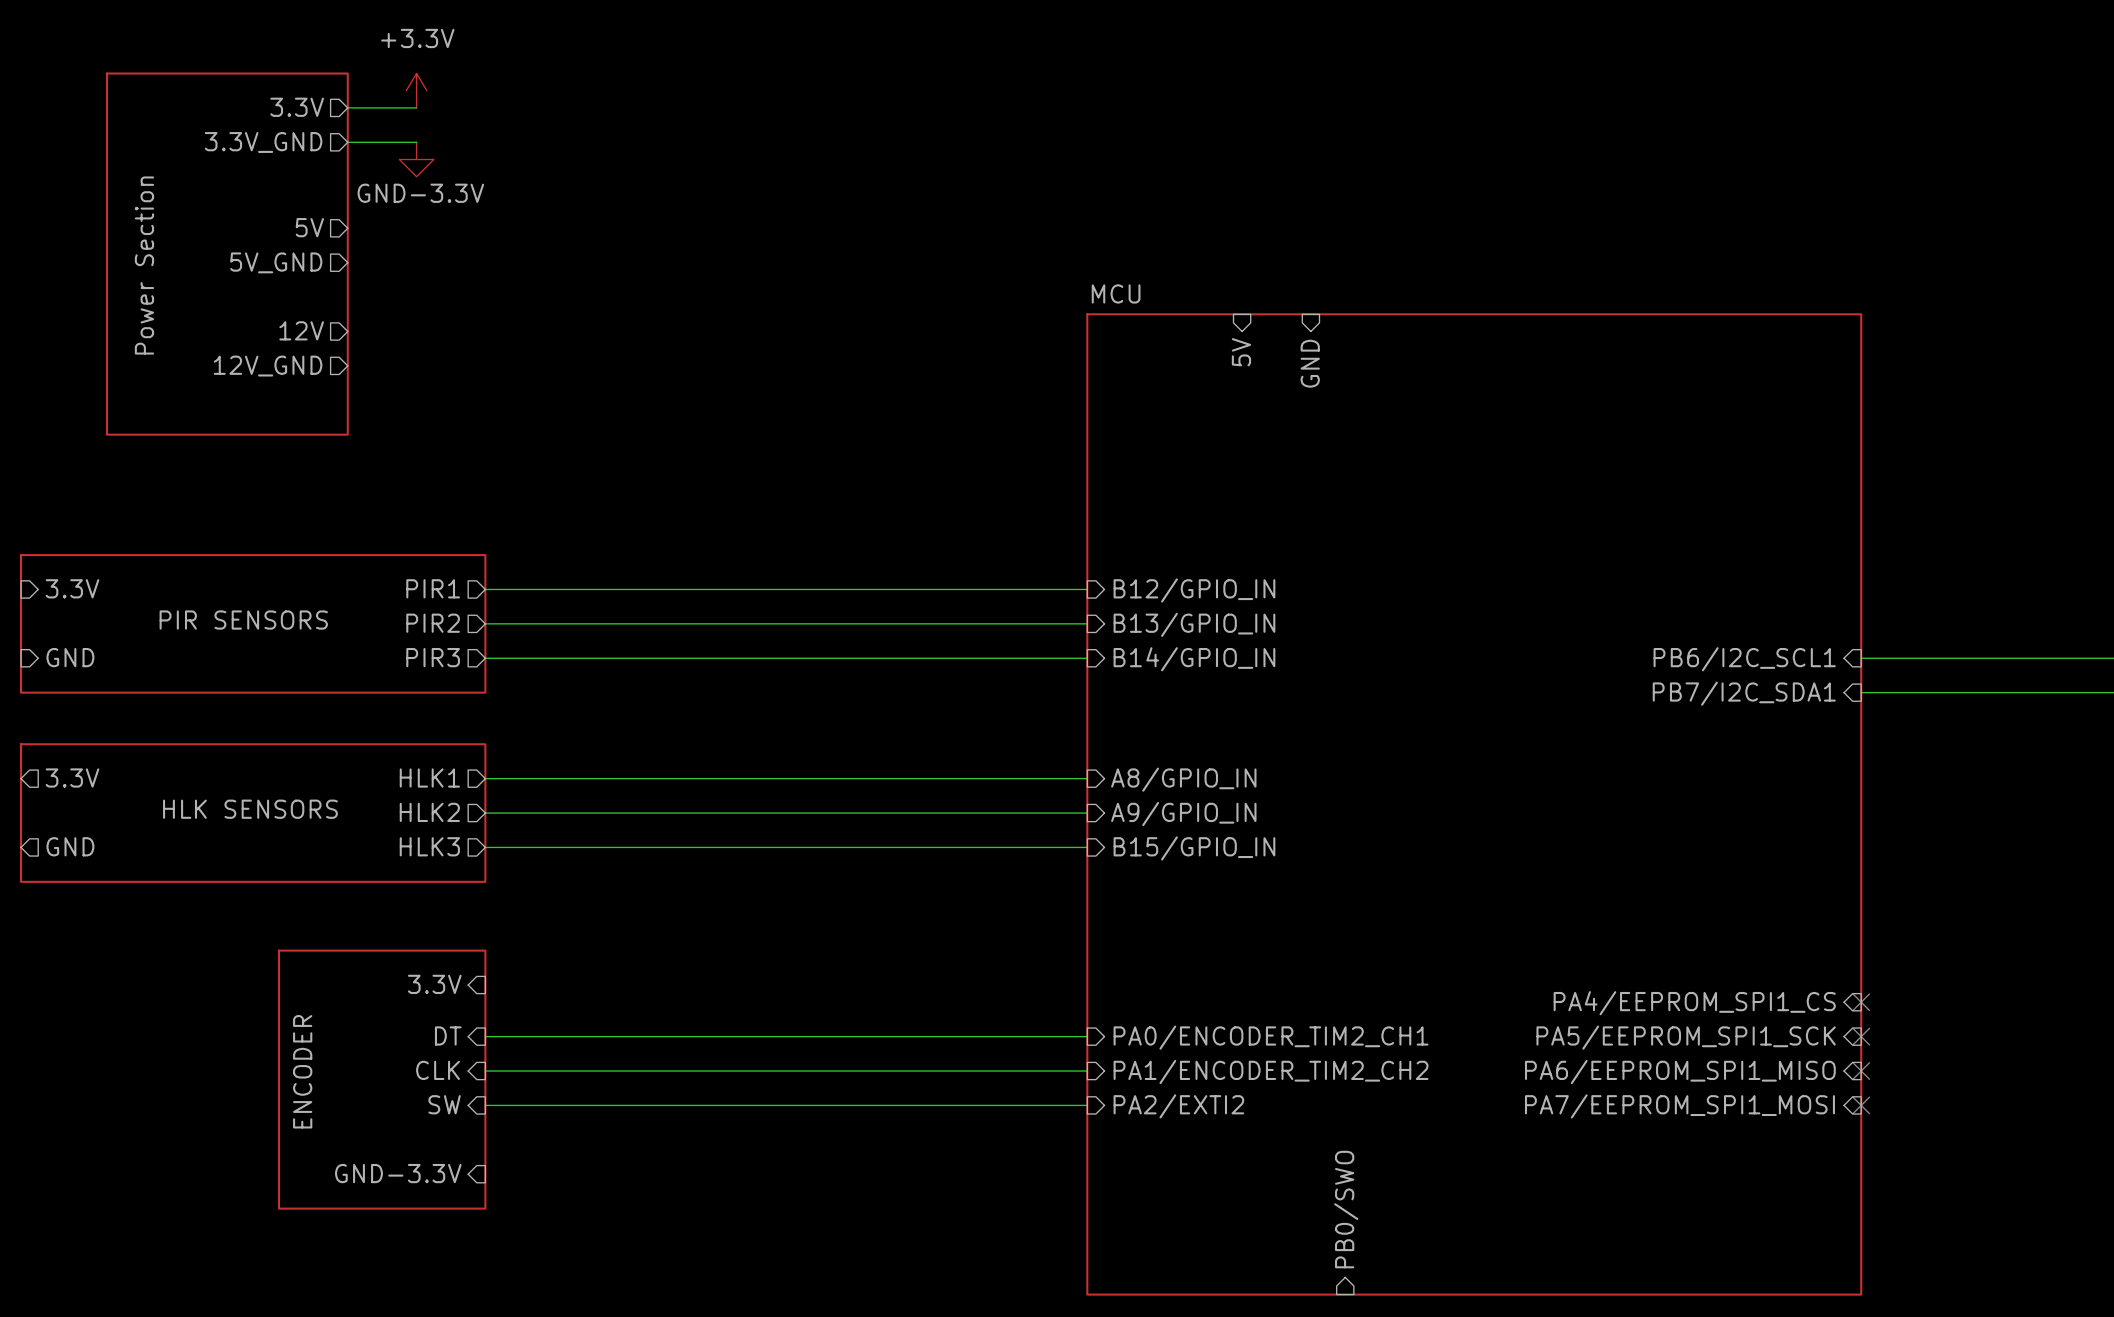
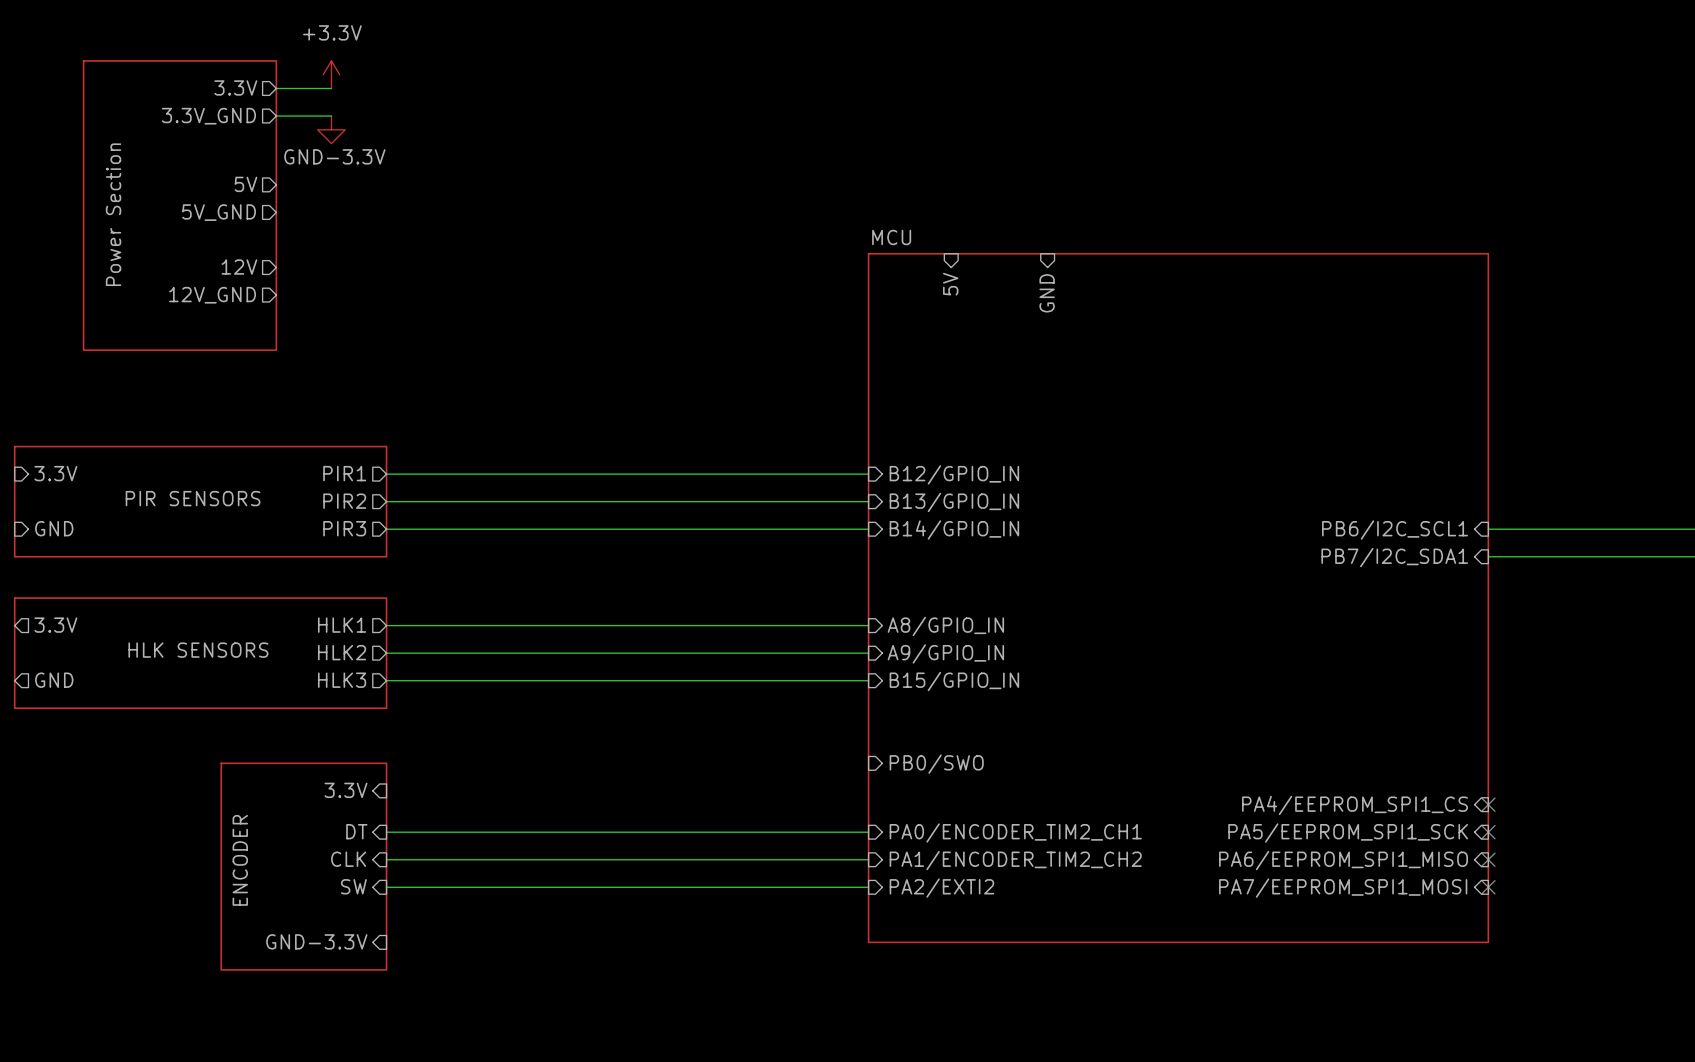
sheet pin position: 5V (1241, 352) -> 5V (950, 284)
sheet MCU: none -> (1178, 598)
sheet MCU: (1474, 804) -> none
sheet pin: none -> PB0/SWO (936, 764)
sheet pin: PB0/SWO (1346, 1209) -> none

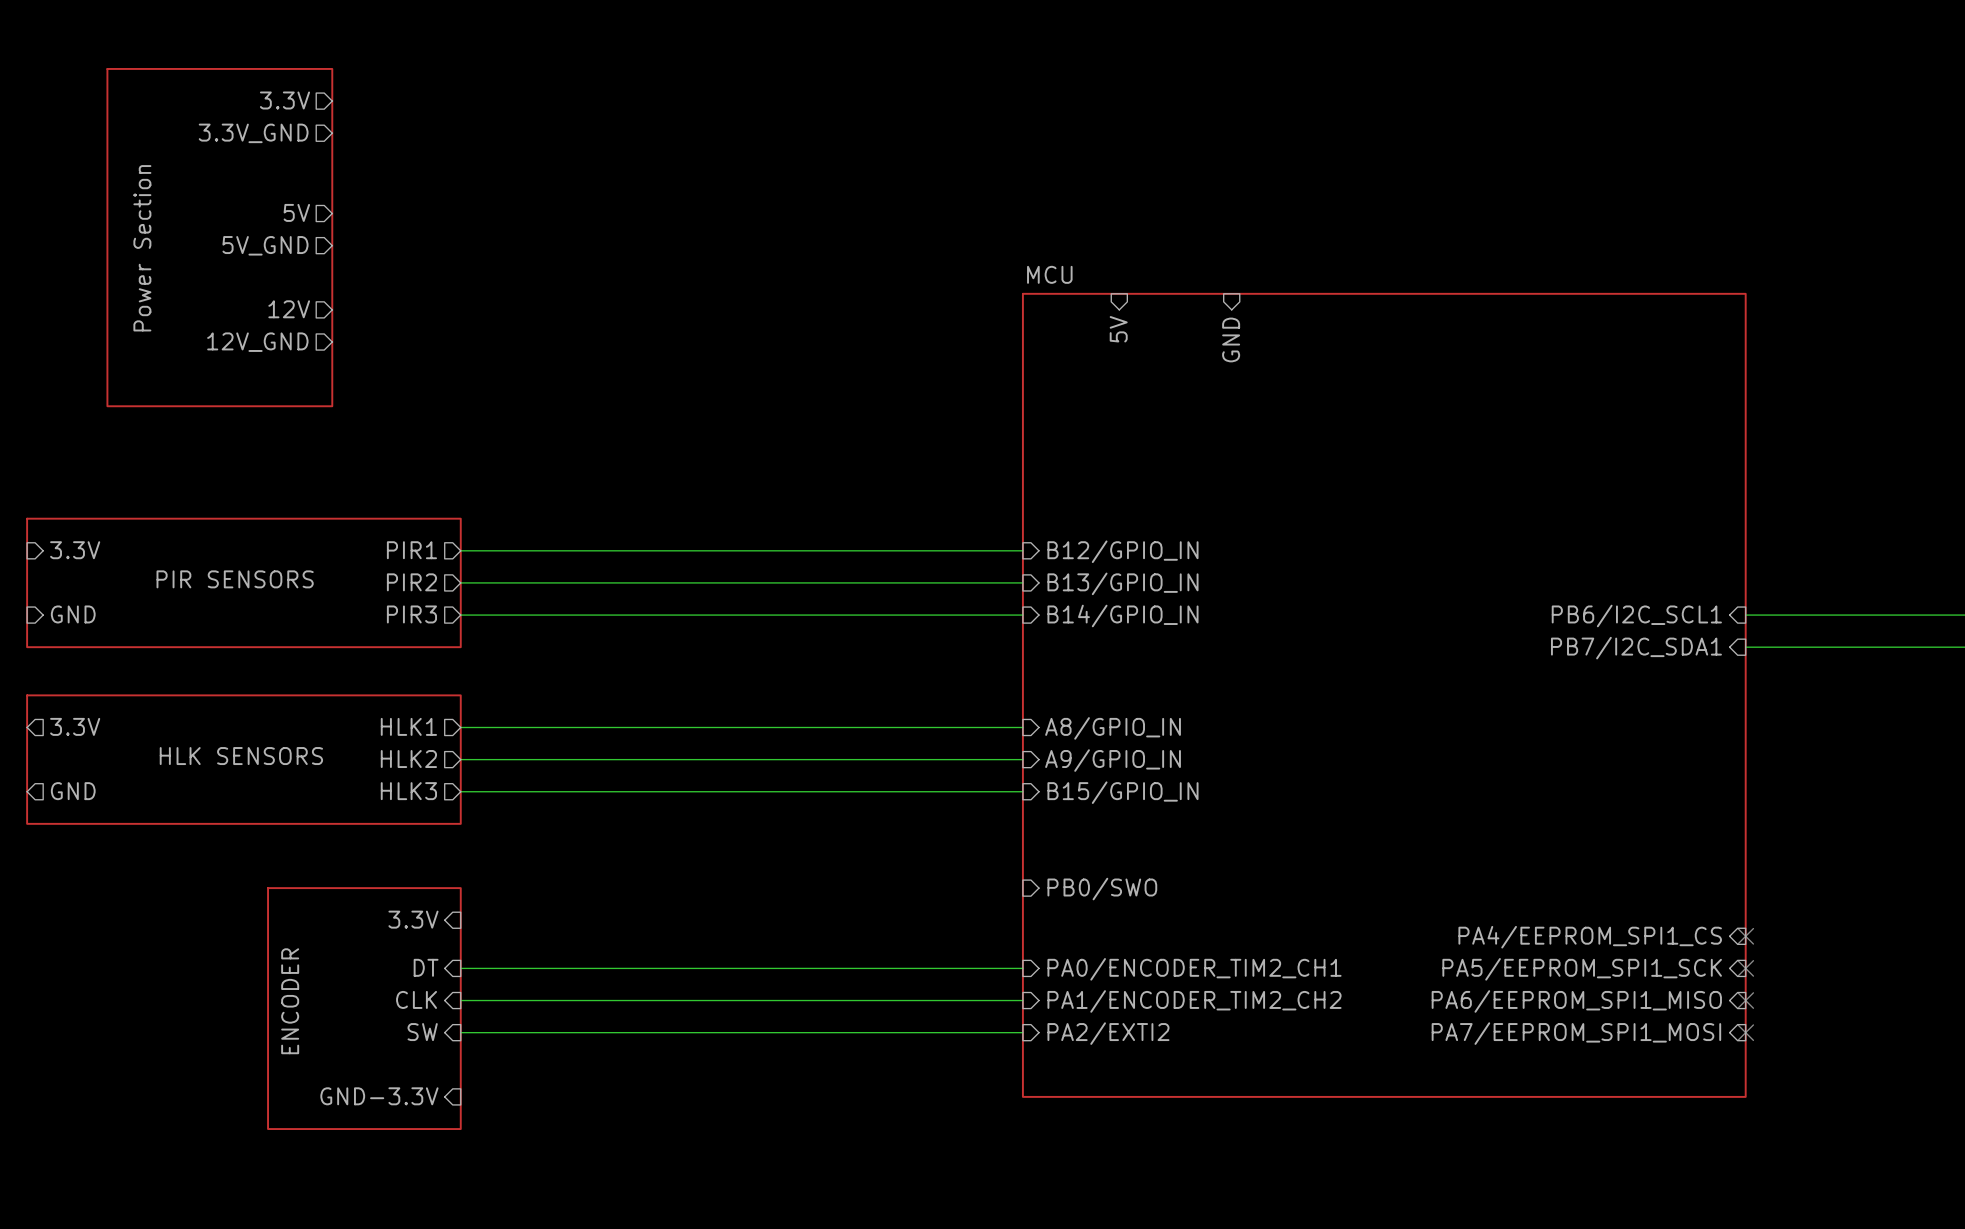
power symbol: +3.3V (331, 74) -> none
wire: (276, 88) (331, 88) -> none
wire: (276, 116) (331, 116) -> none
power symbol: GND-3.3V (331, 129) -> none

